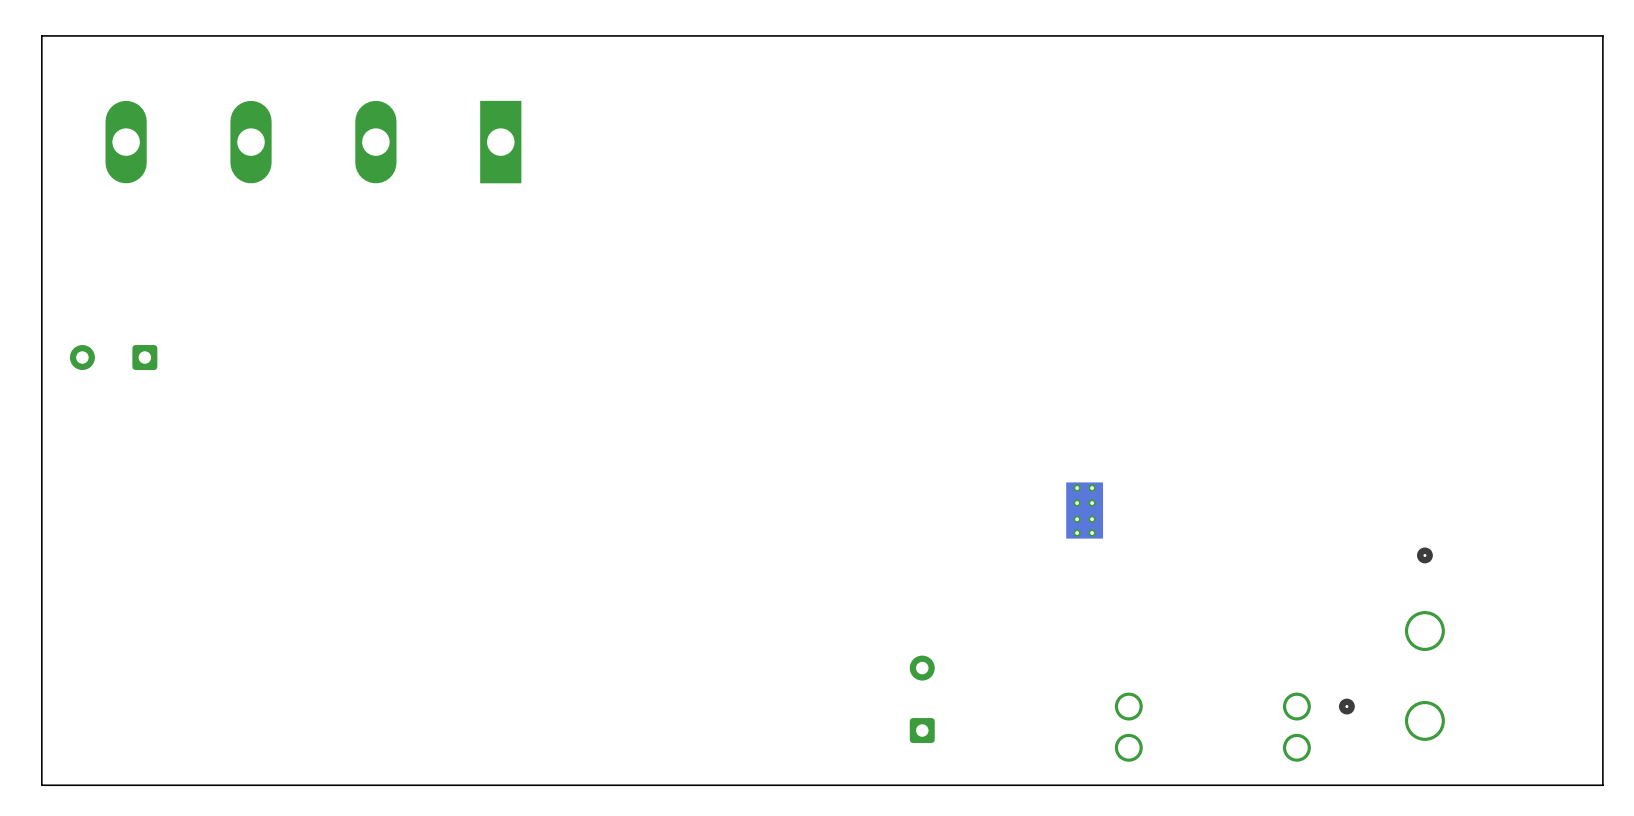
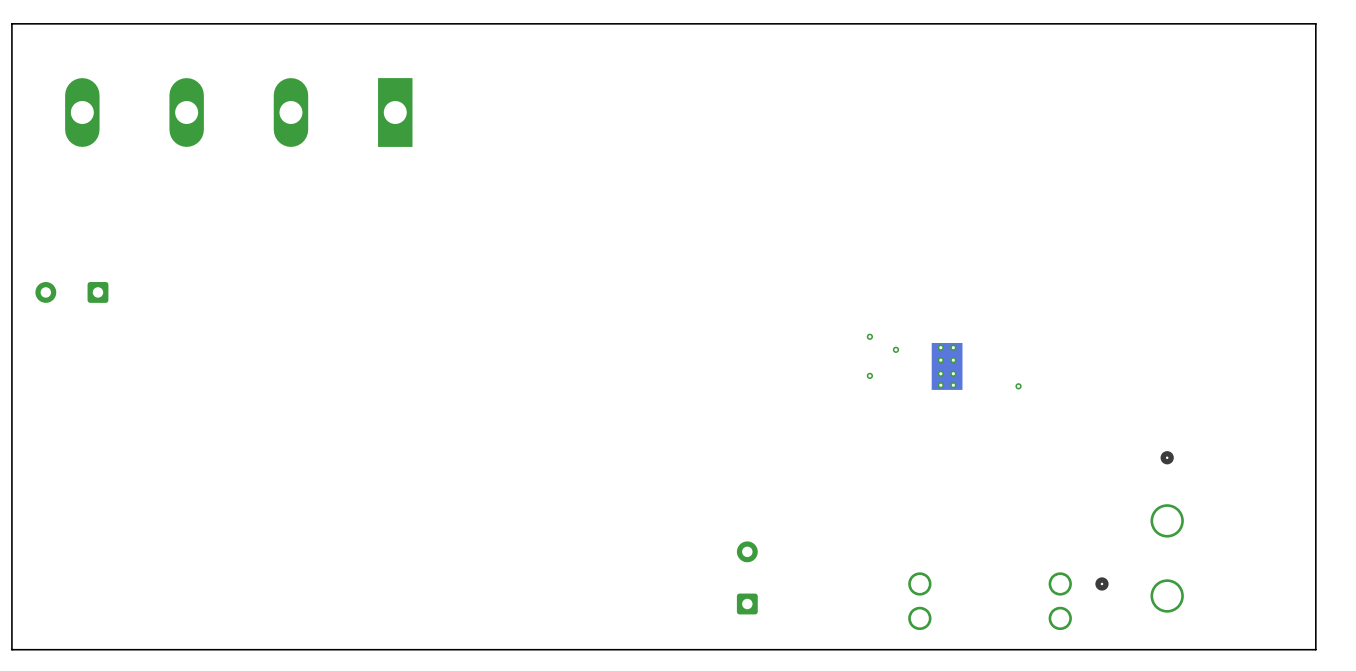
via: none -> (869, 336)
via: none -> (895, 349)
via: none -> (869, 375)
via: none -> (1018, 386)
part position: (1084, 510) -> (947, 366)

